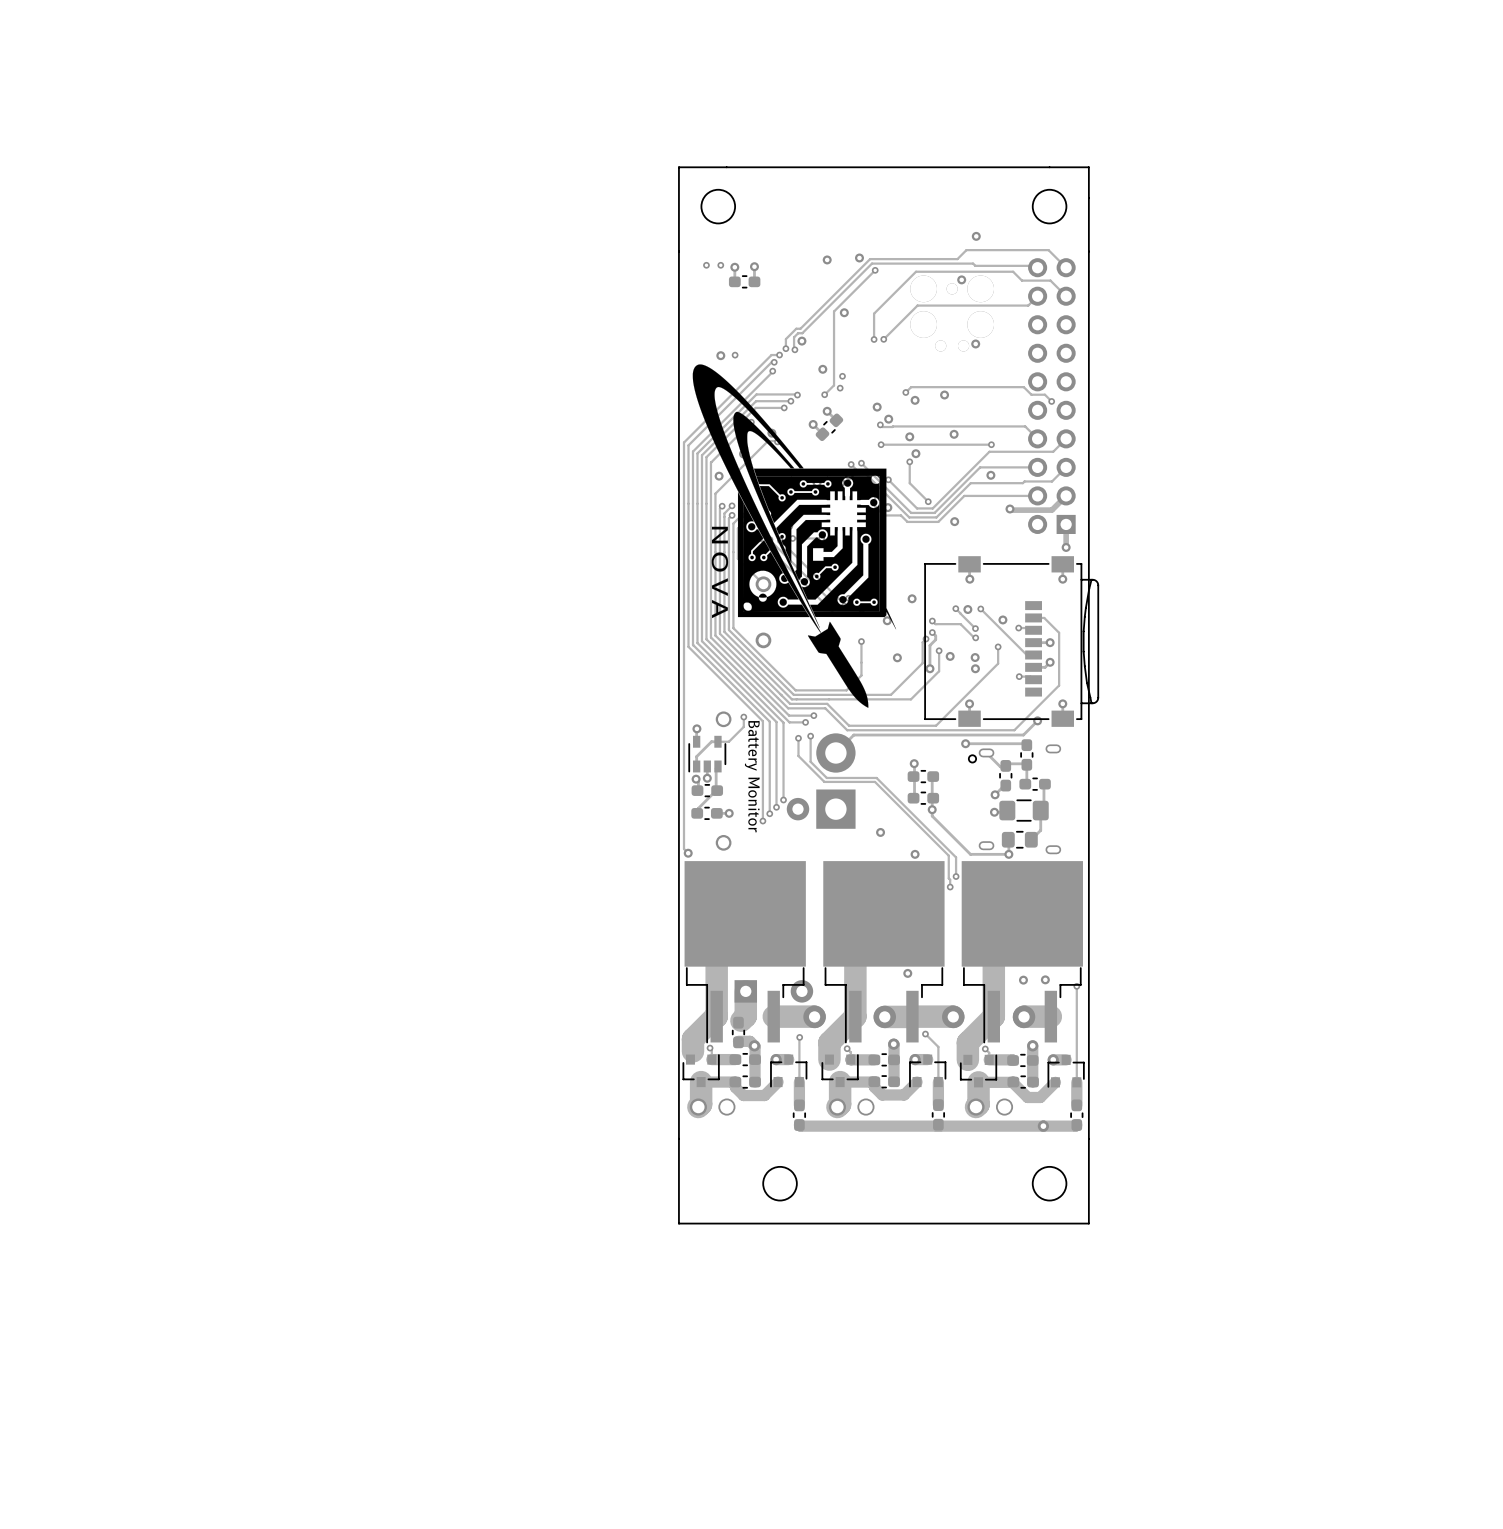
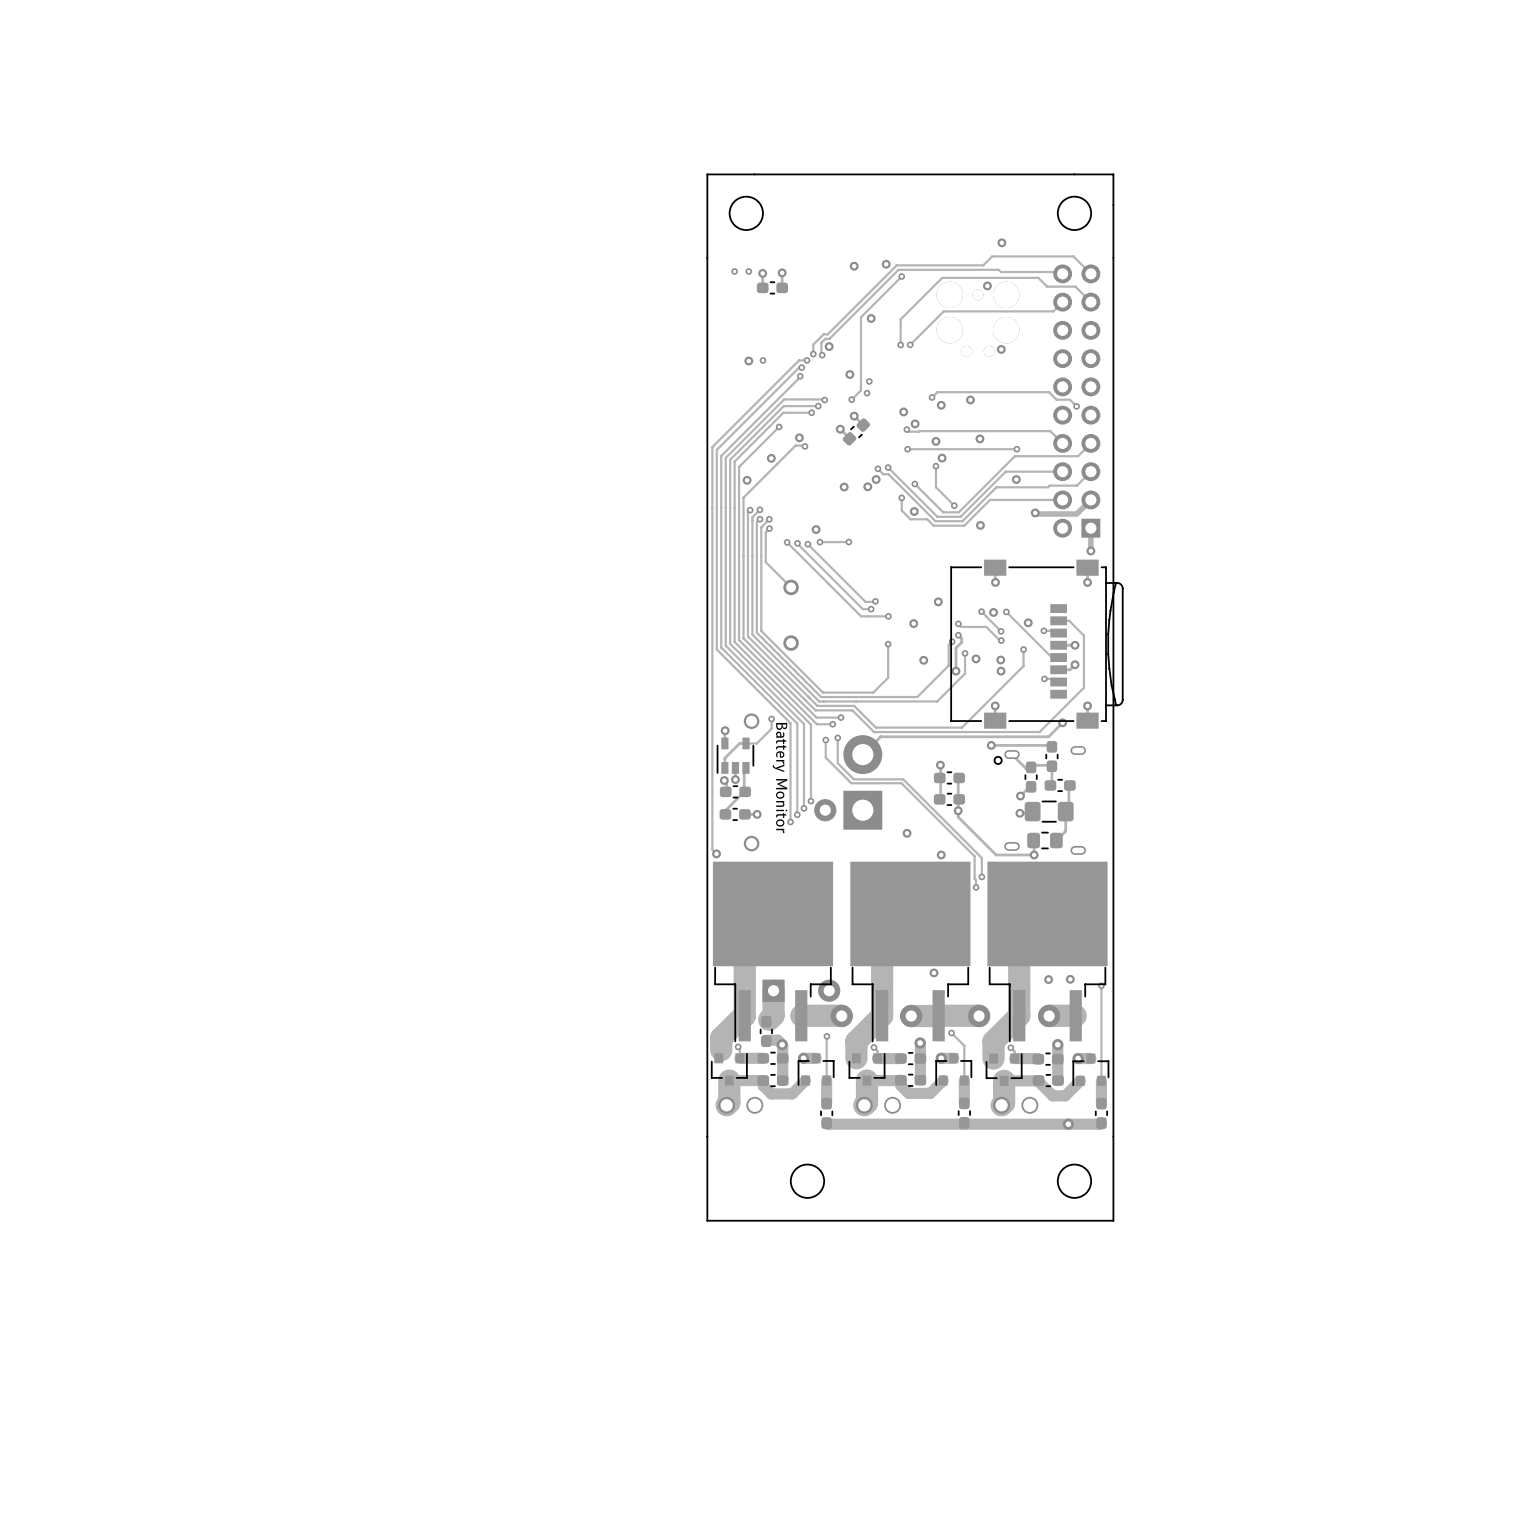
drawing: [692, 364, 897, 708] -> none

